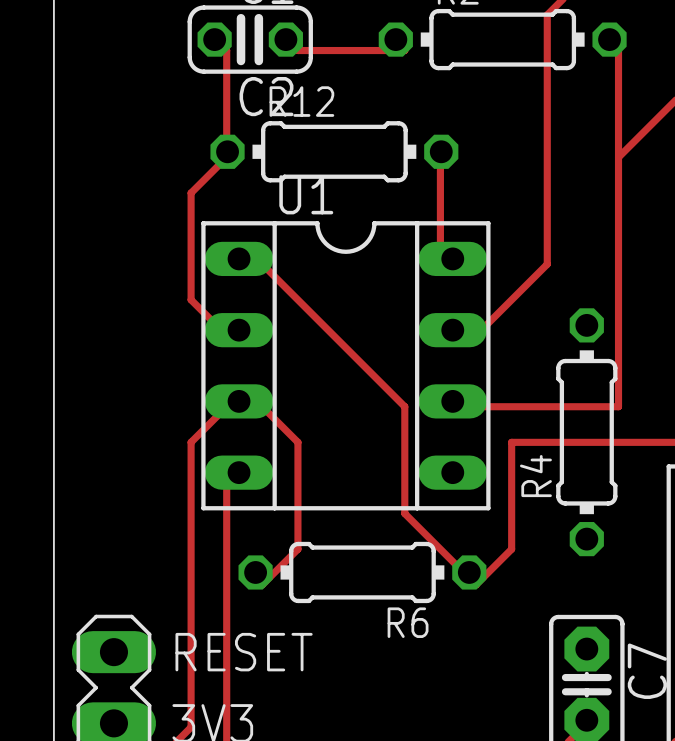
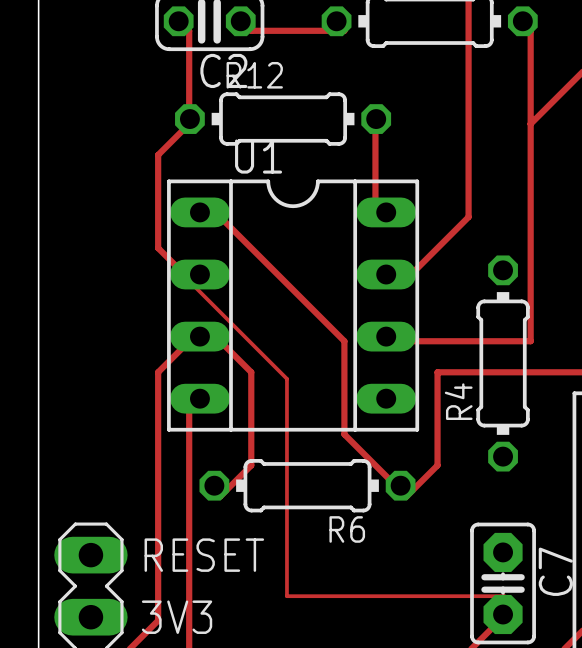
track: none -> (199, 274) (193, 285) (286, 378) (286, 596) (504, 596) (503, 614)

